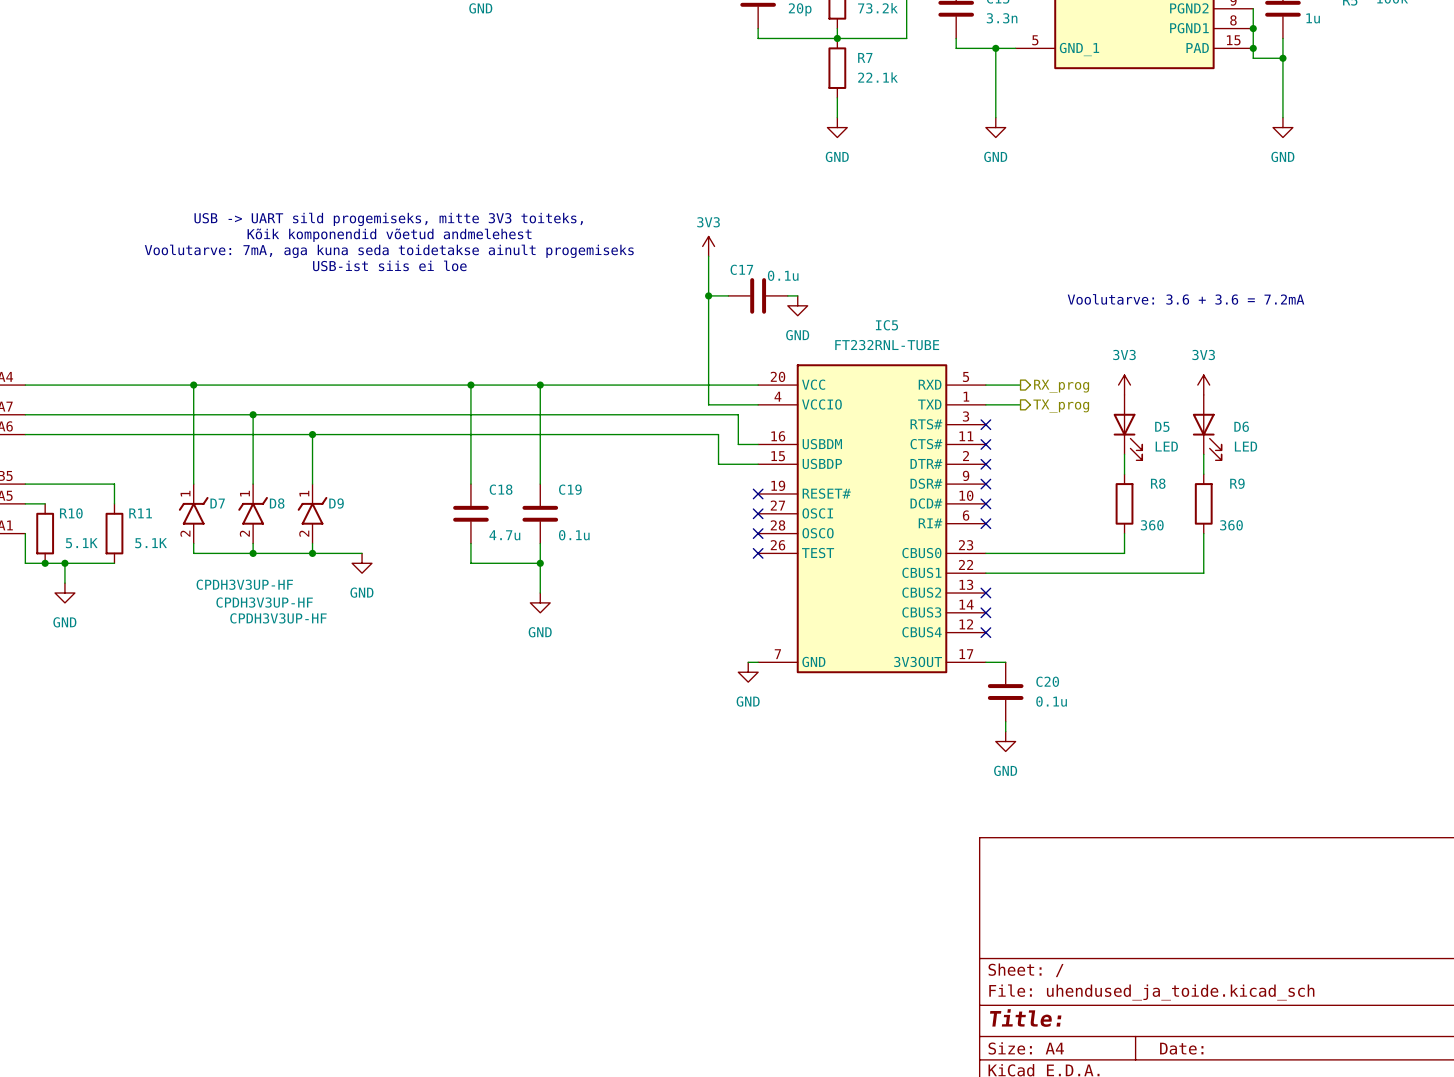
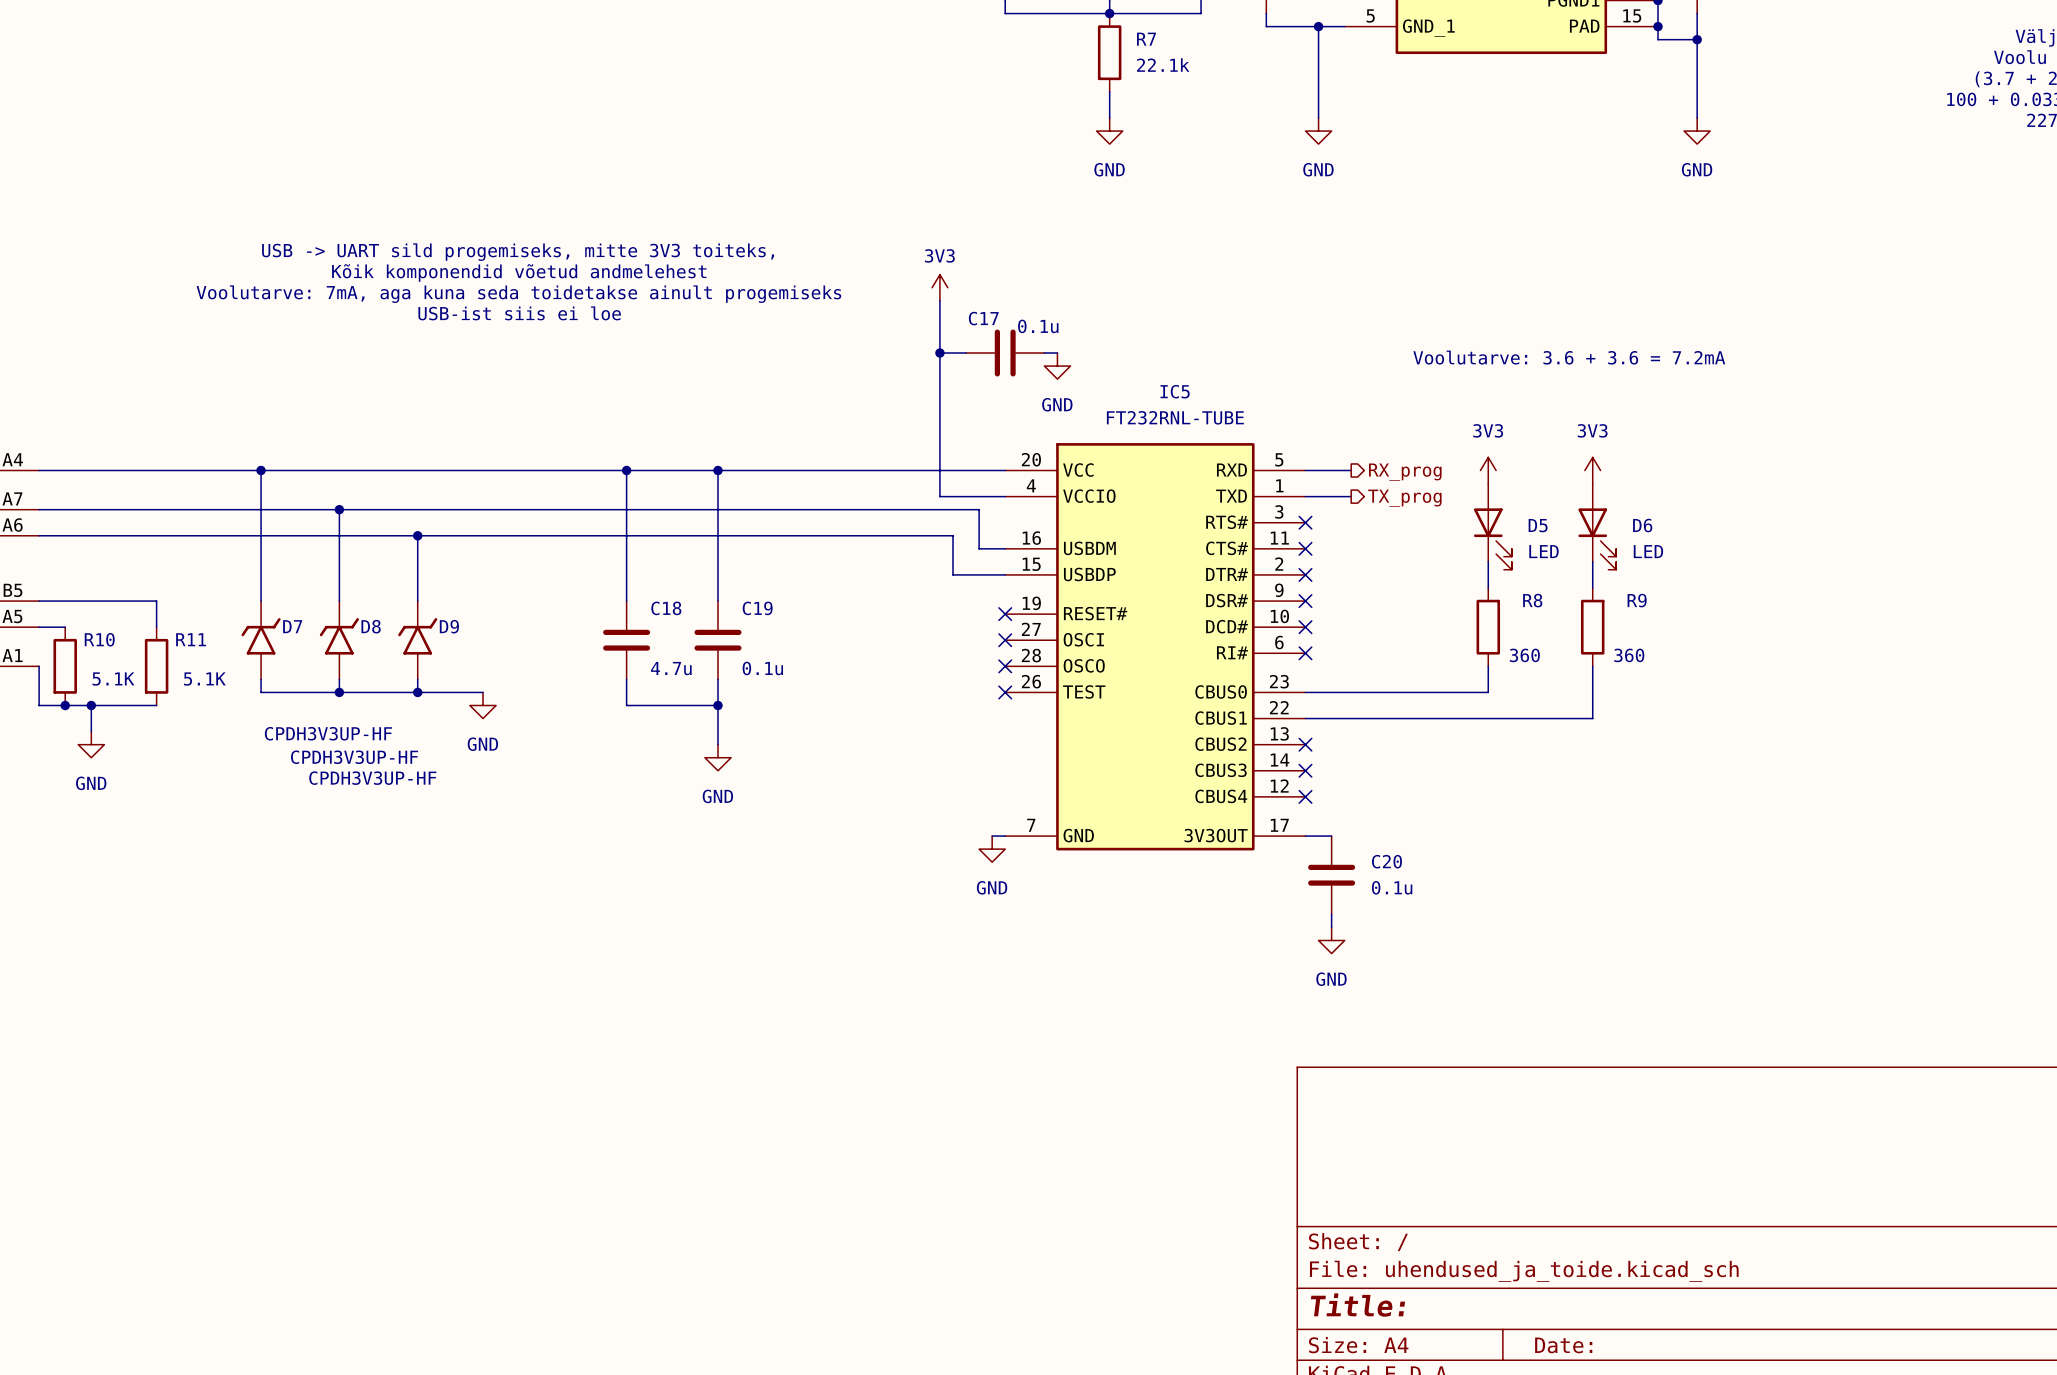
D7 pin number: 1 (185, 493) -> none
D8 pin number: 1 (244, 493) -> none
D9 pin number: 1 (304, 493) -> none
D7 pin number: 2 (185, 533) -> none
D8 pin number: 2 (244, 533) -> none
D9 pin number: 2 (304, 533) -> none

